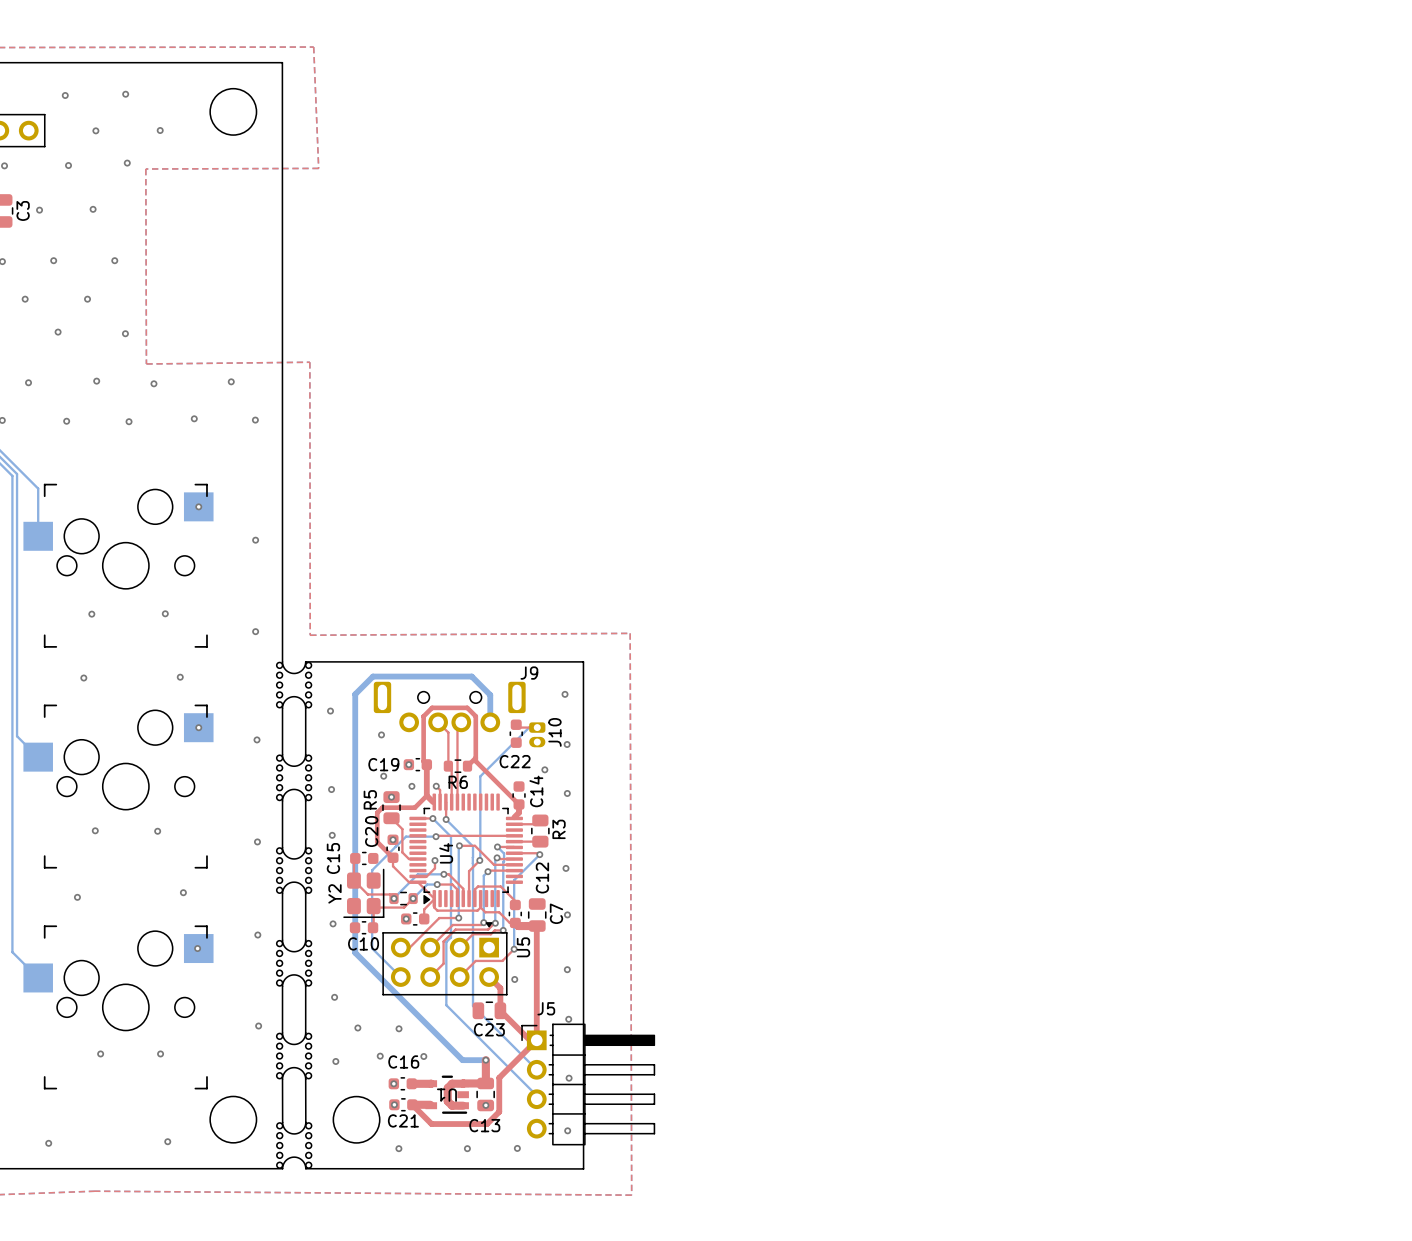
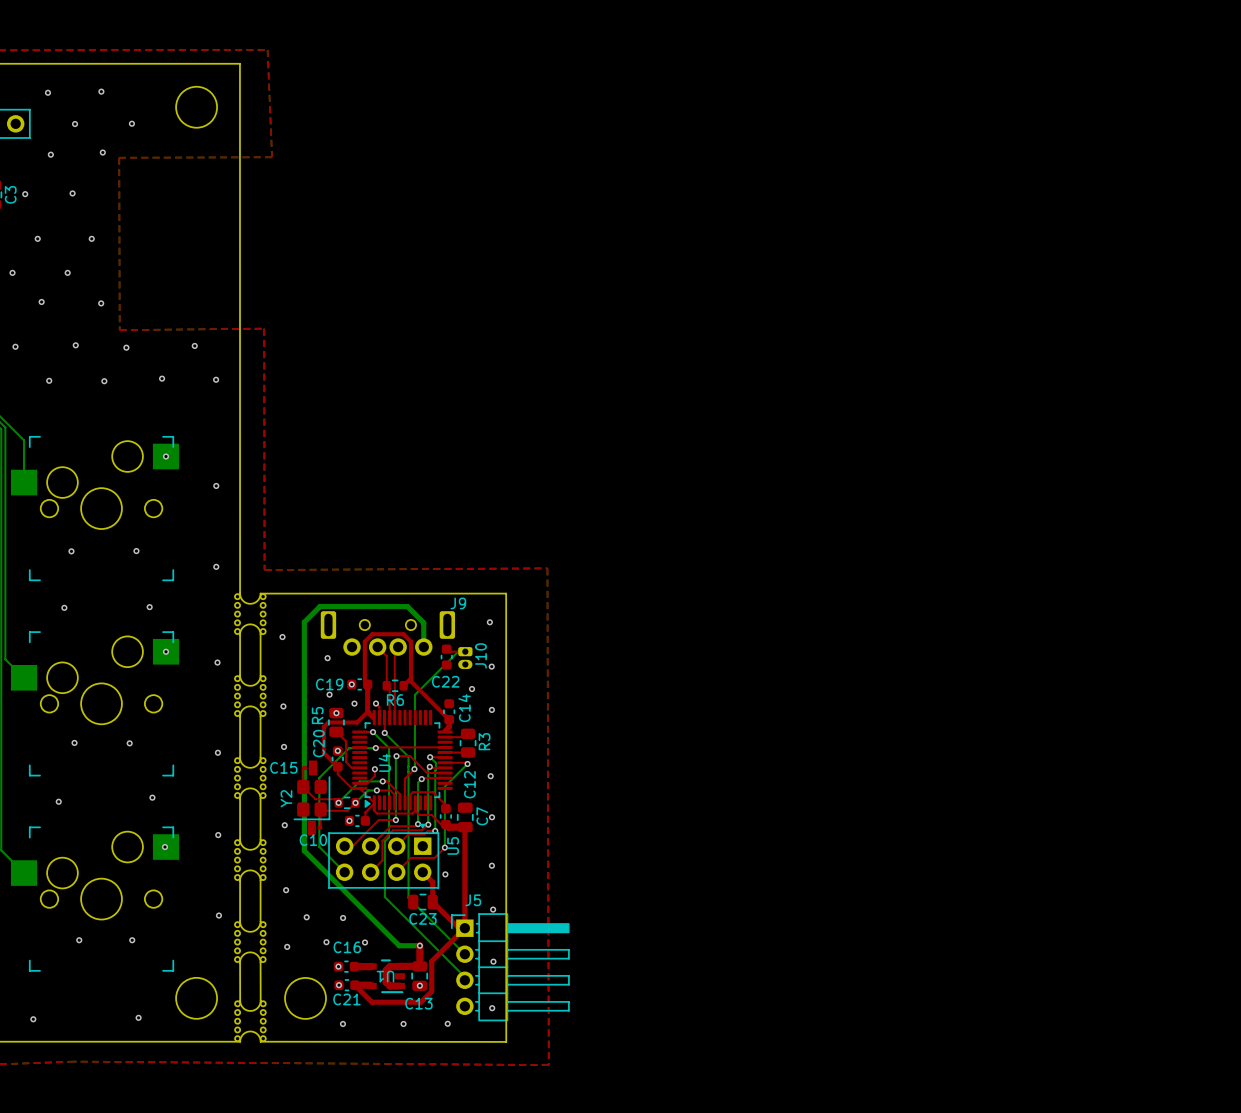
drawing: none -> [308, 760, 318, 776]
C15 footprint: [350, 851, 379, 866] -> [302, 765, 314, 770]
drawing: none -> [307, 820, 316, 836]
C10 footprint: [349, 921, 379, 935] -> [310, 825, 323, 830]

